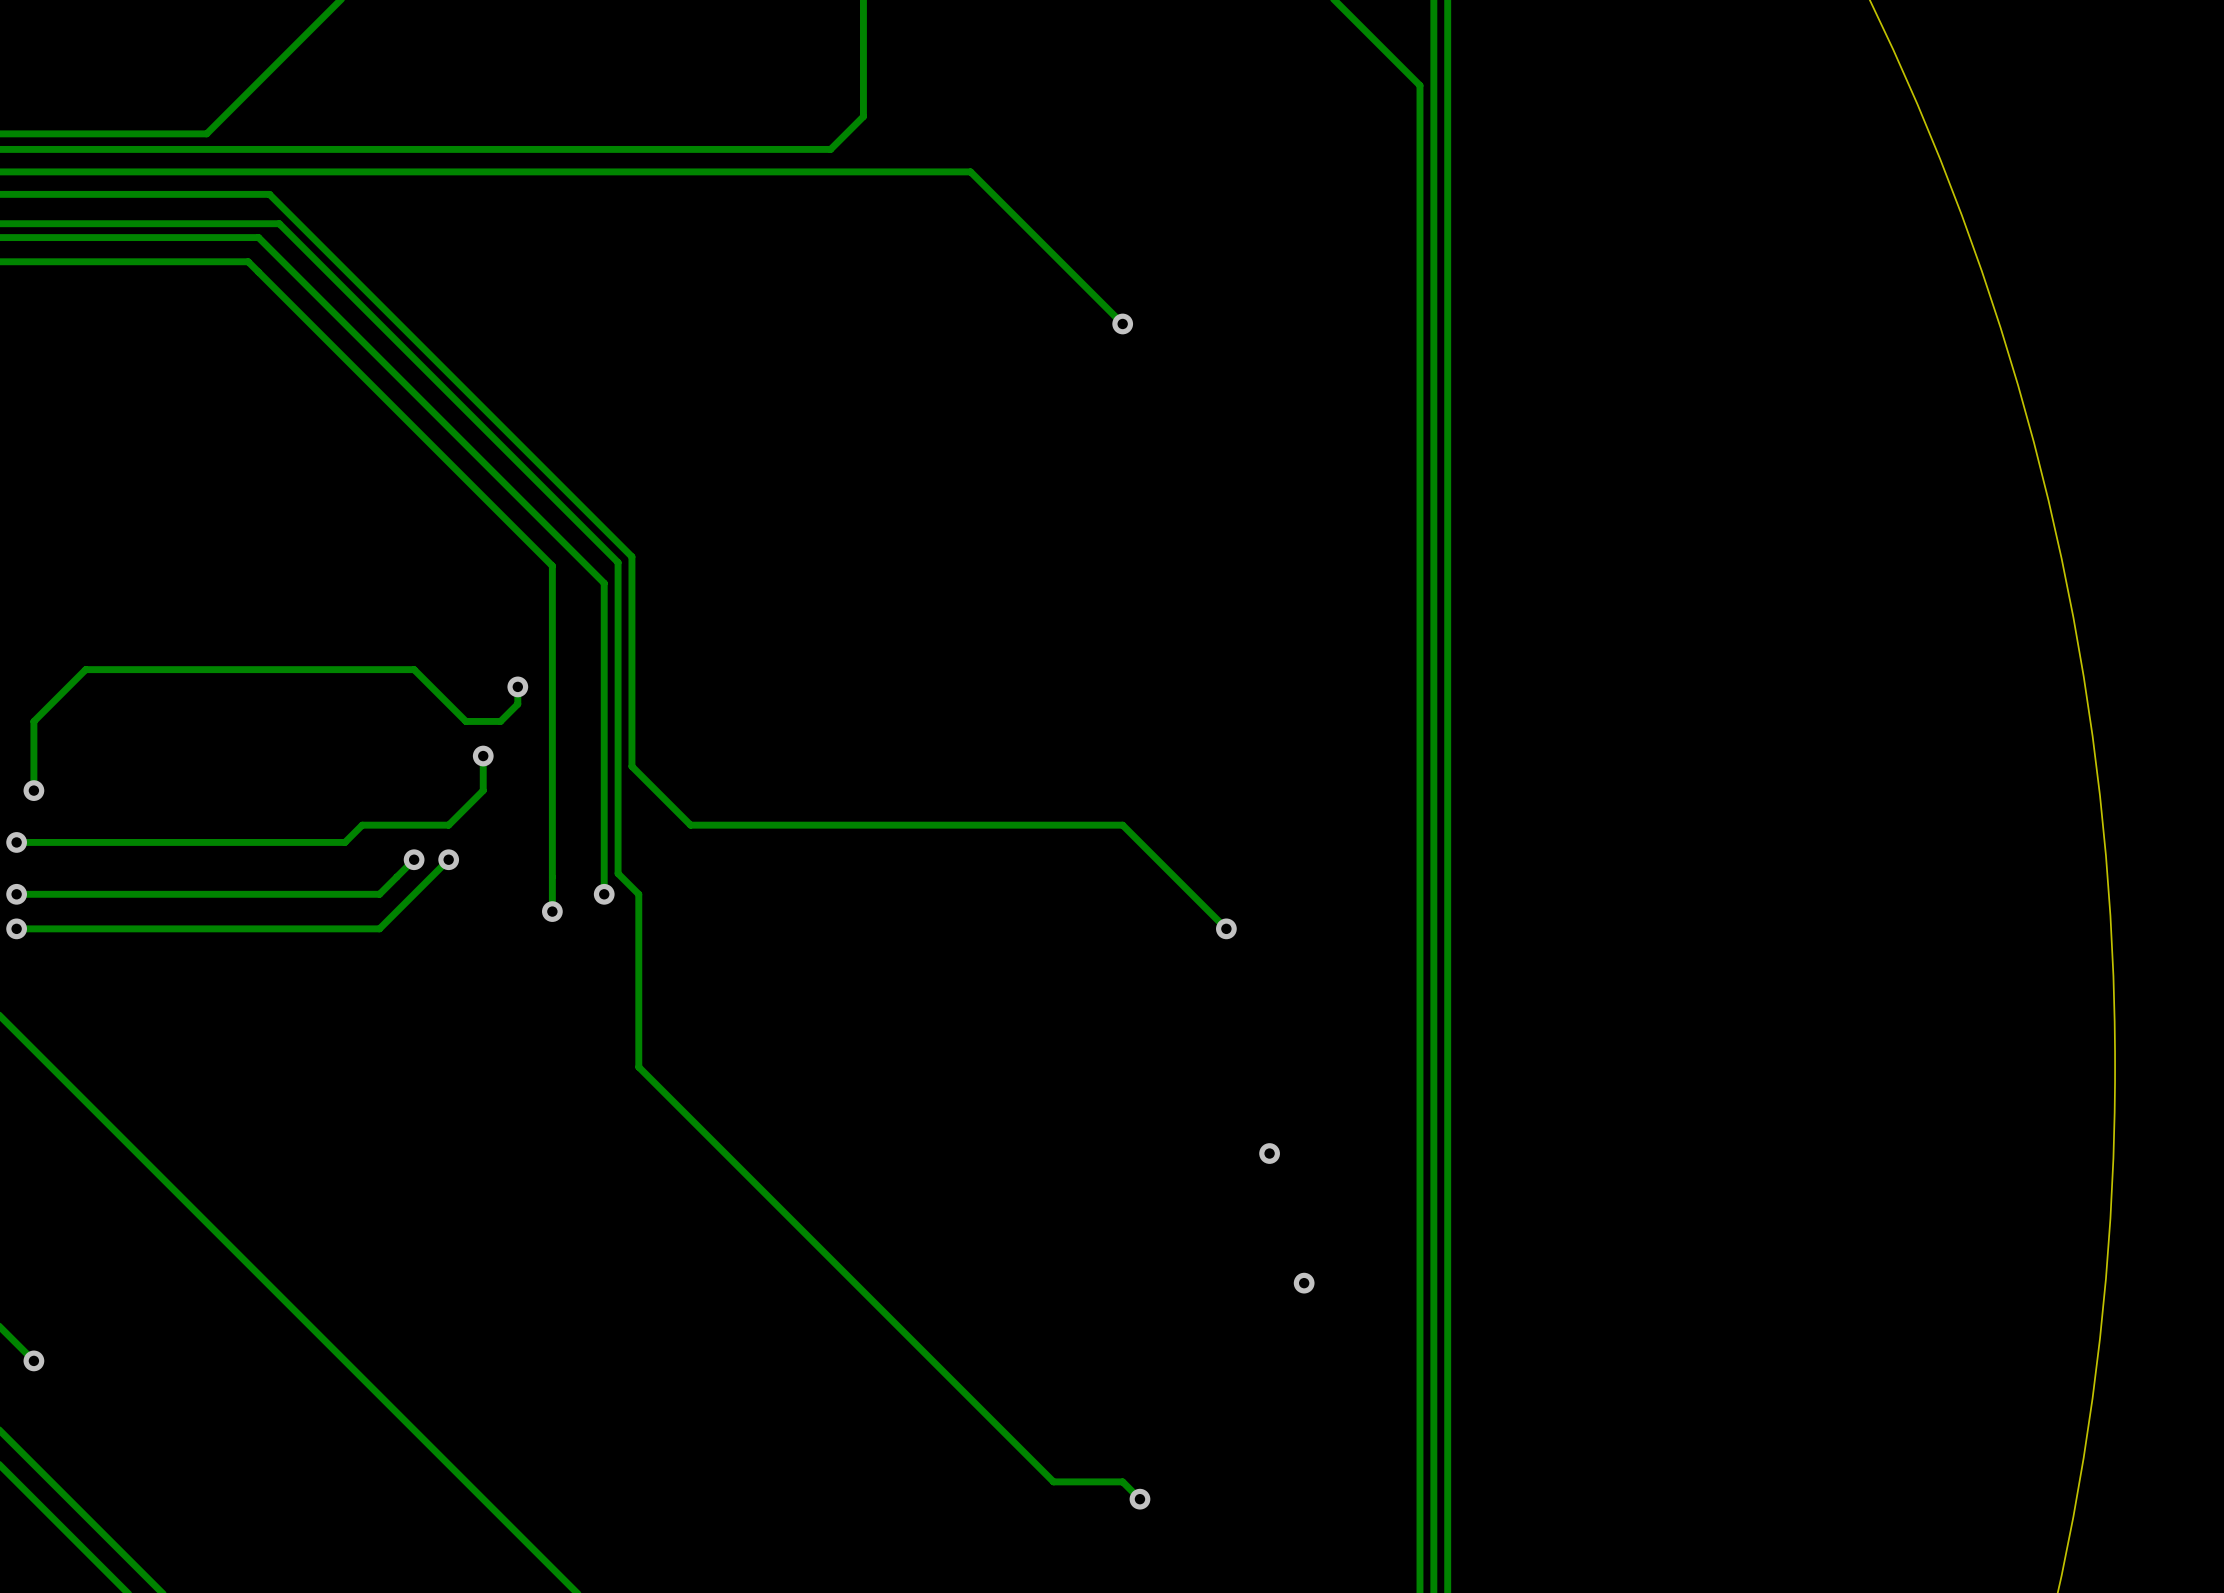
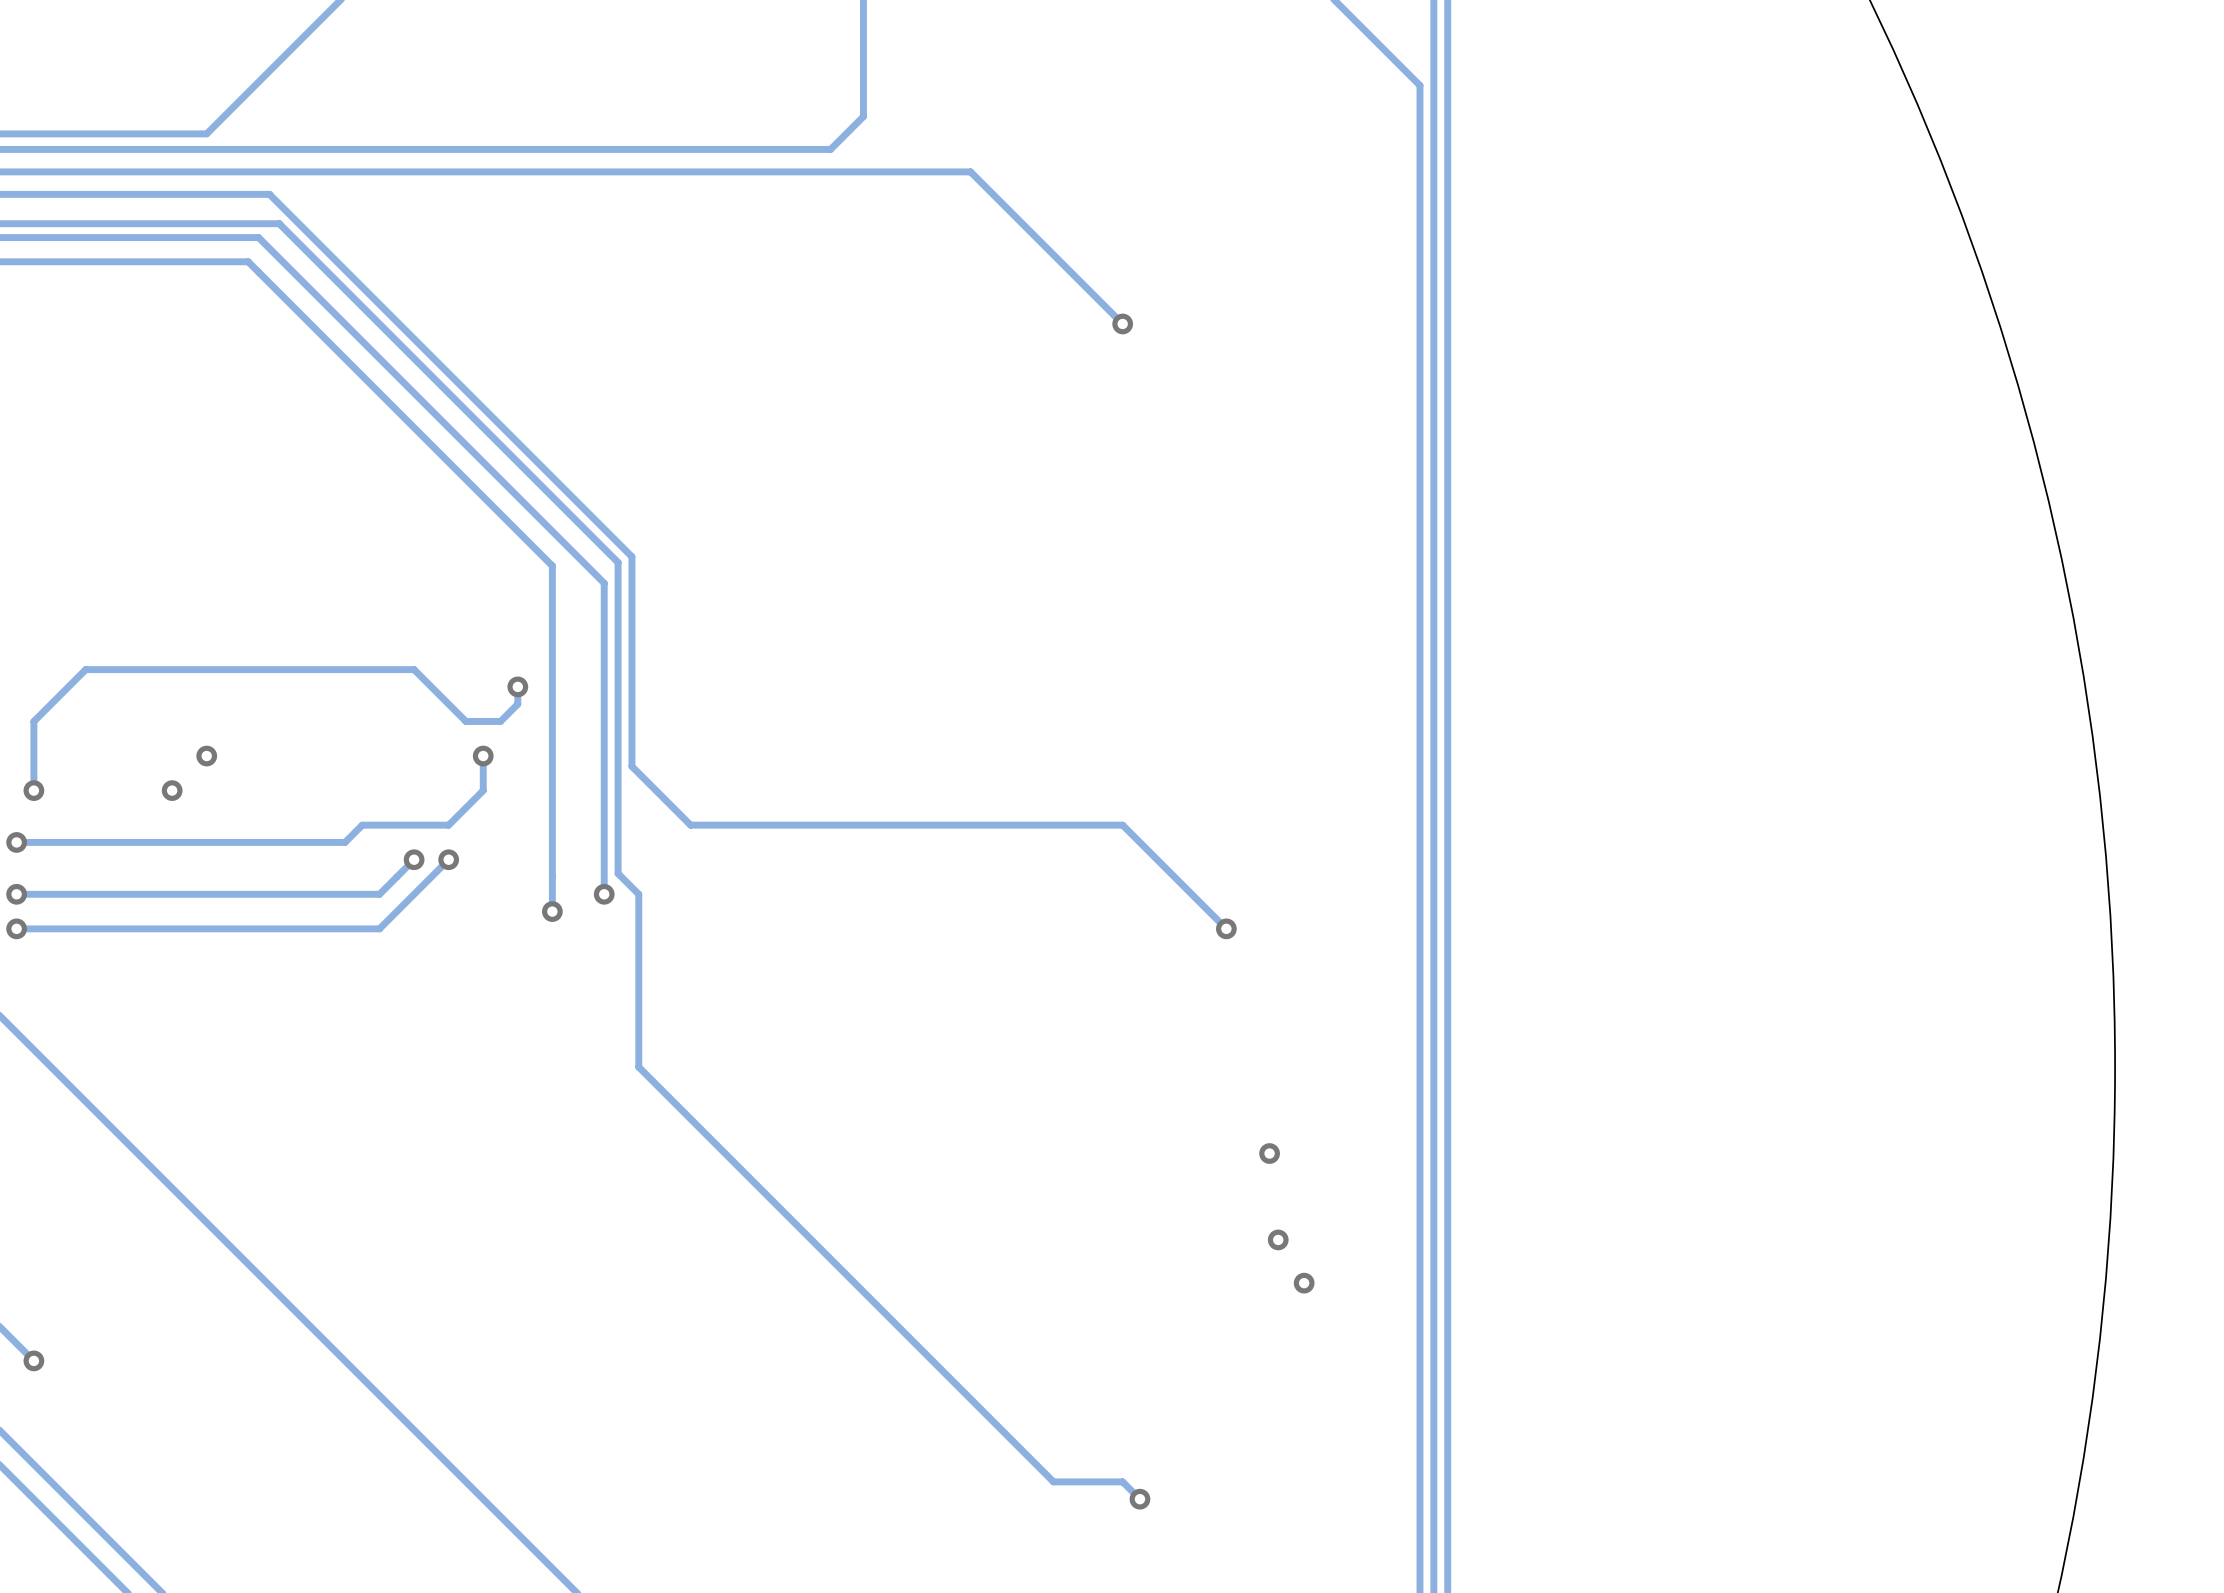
via: none -> (206, 756)
via: none -> (172, 790)
via: none -> (1278, 1239)

